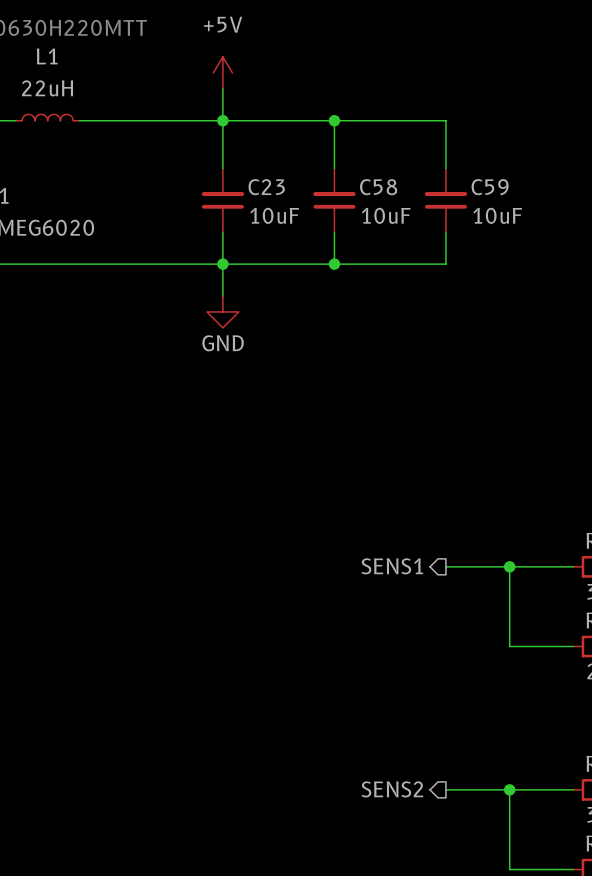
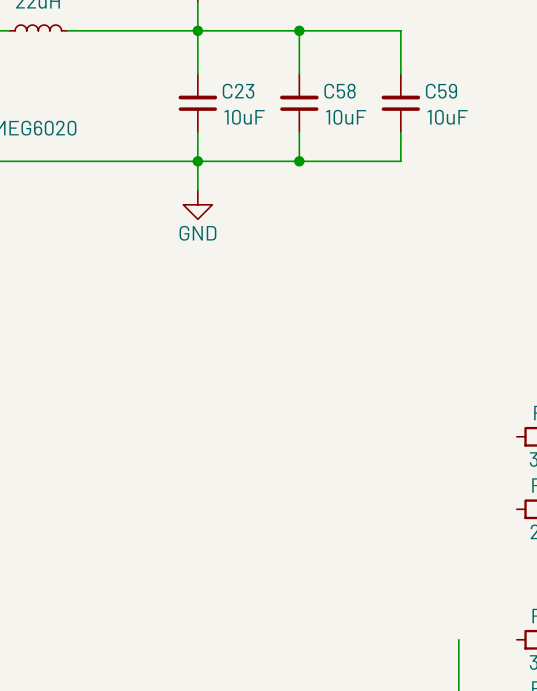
hierarchical label: SENS1 (392, 566) -> none
wire: (445, 566) (573, 566) -> none
wire: (509, 566) (509, 646) (573, 646) -> none
junction: (509, 566) -> none
hierarchical label: SENS2 (392, 789) -> none
wire: (445, 789) (573, 789) -> none
junction: (509, 789) -> none

